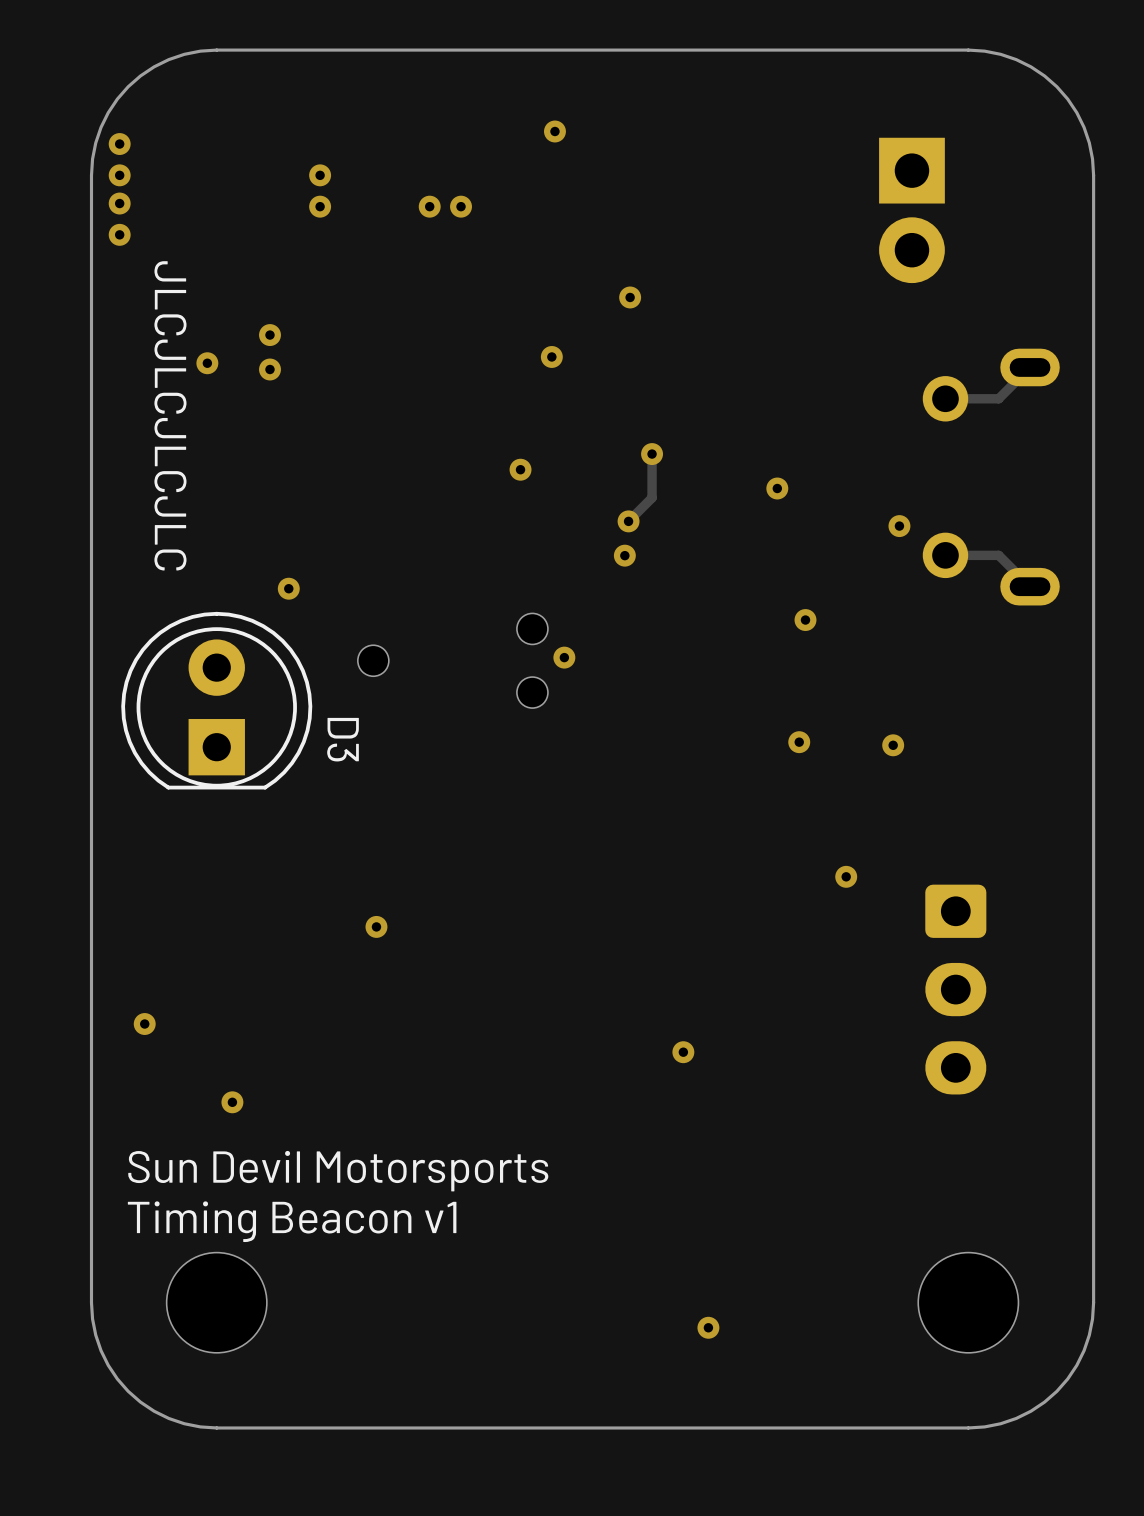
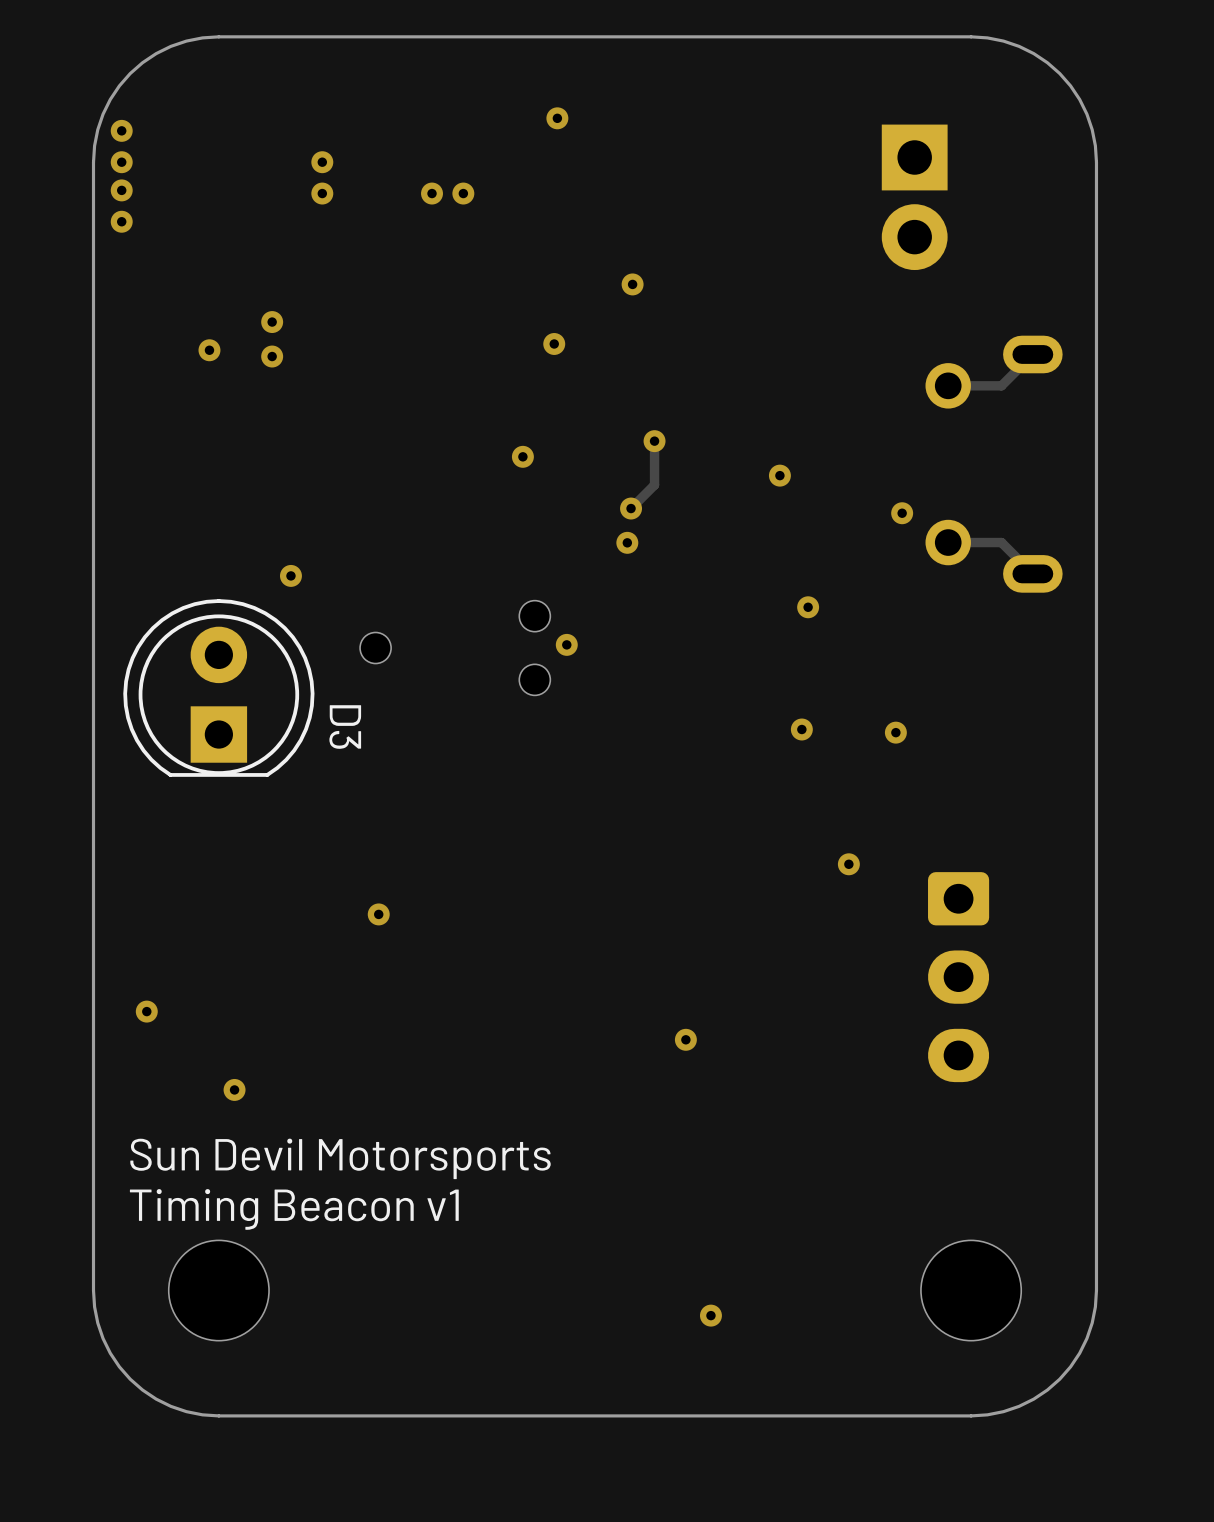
text: JLCJLCJLCJLC (170, 415) -> none

